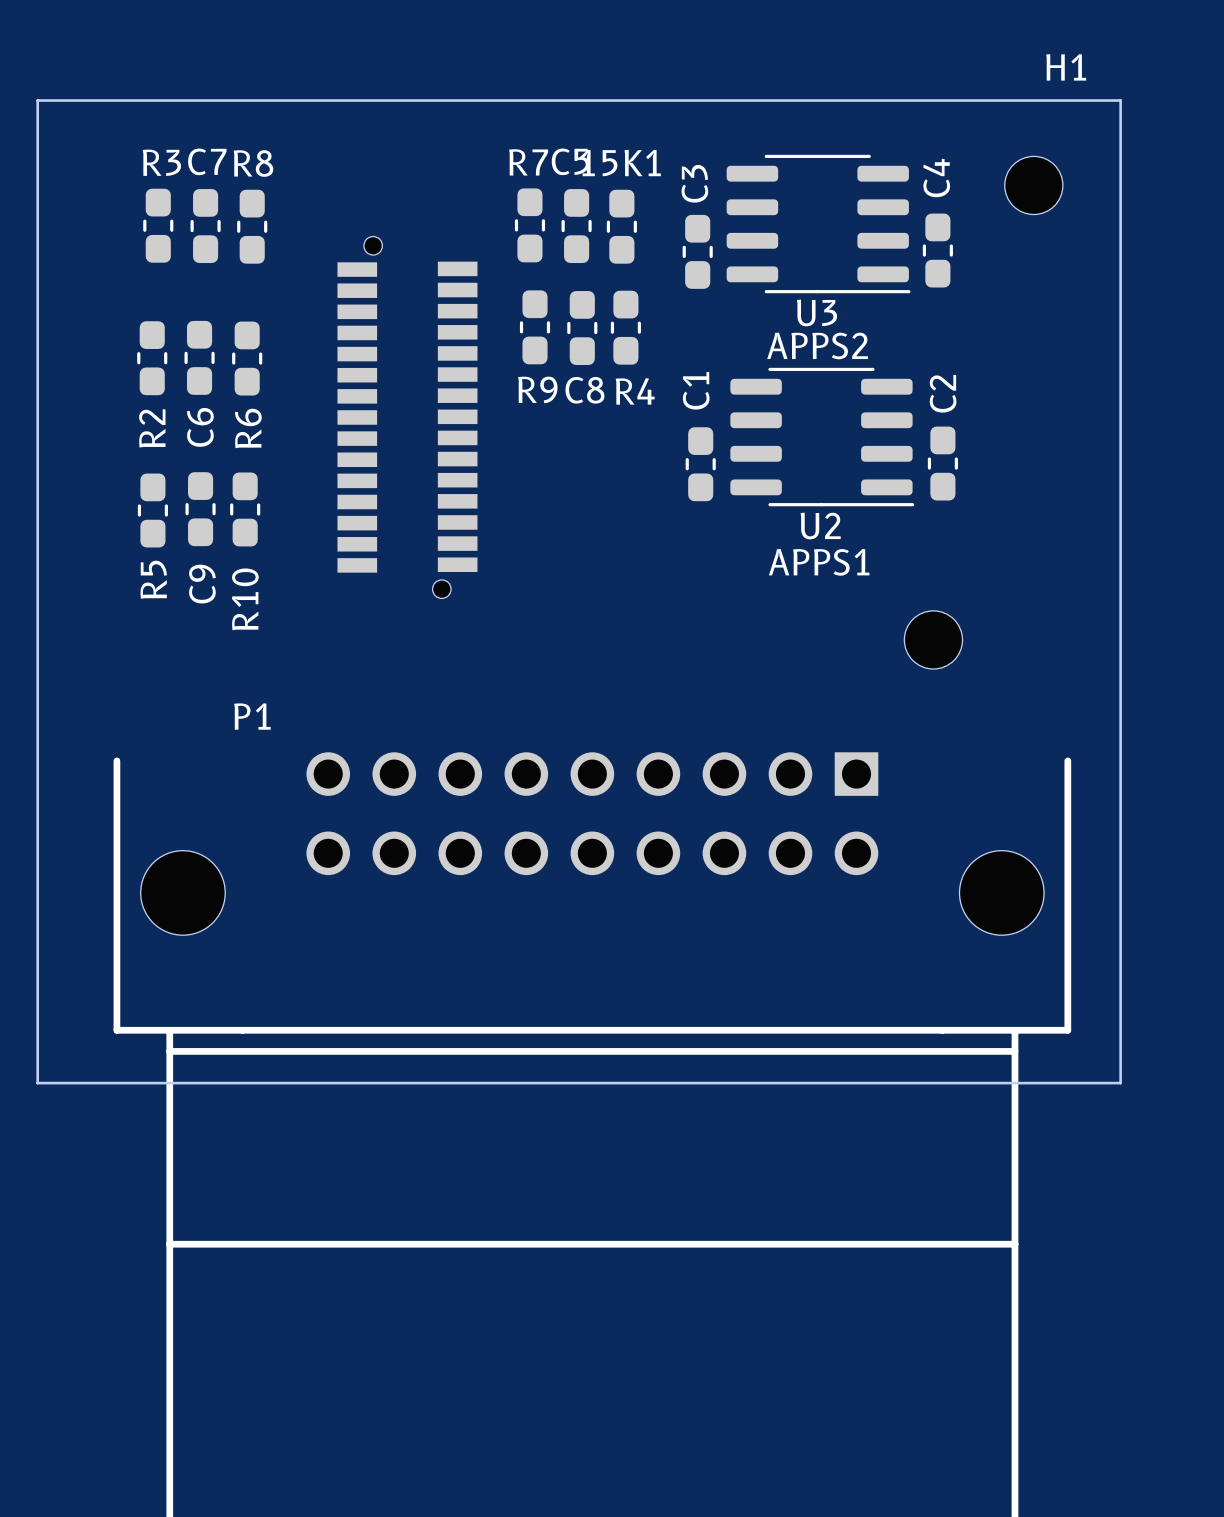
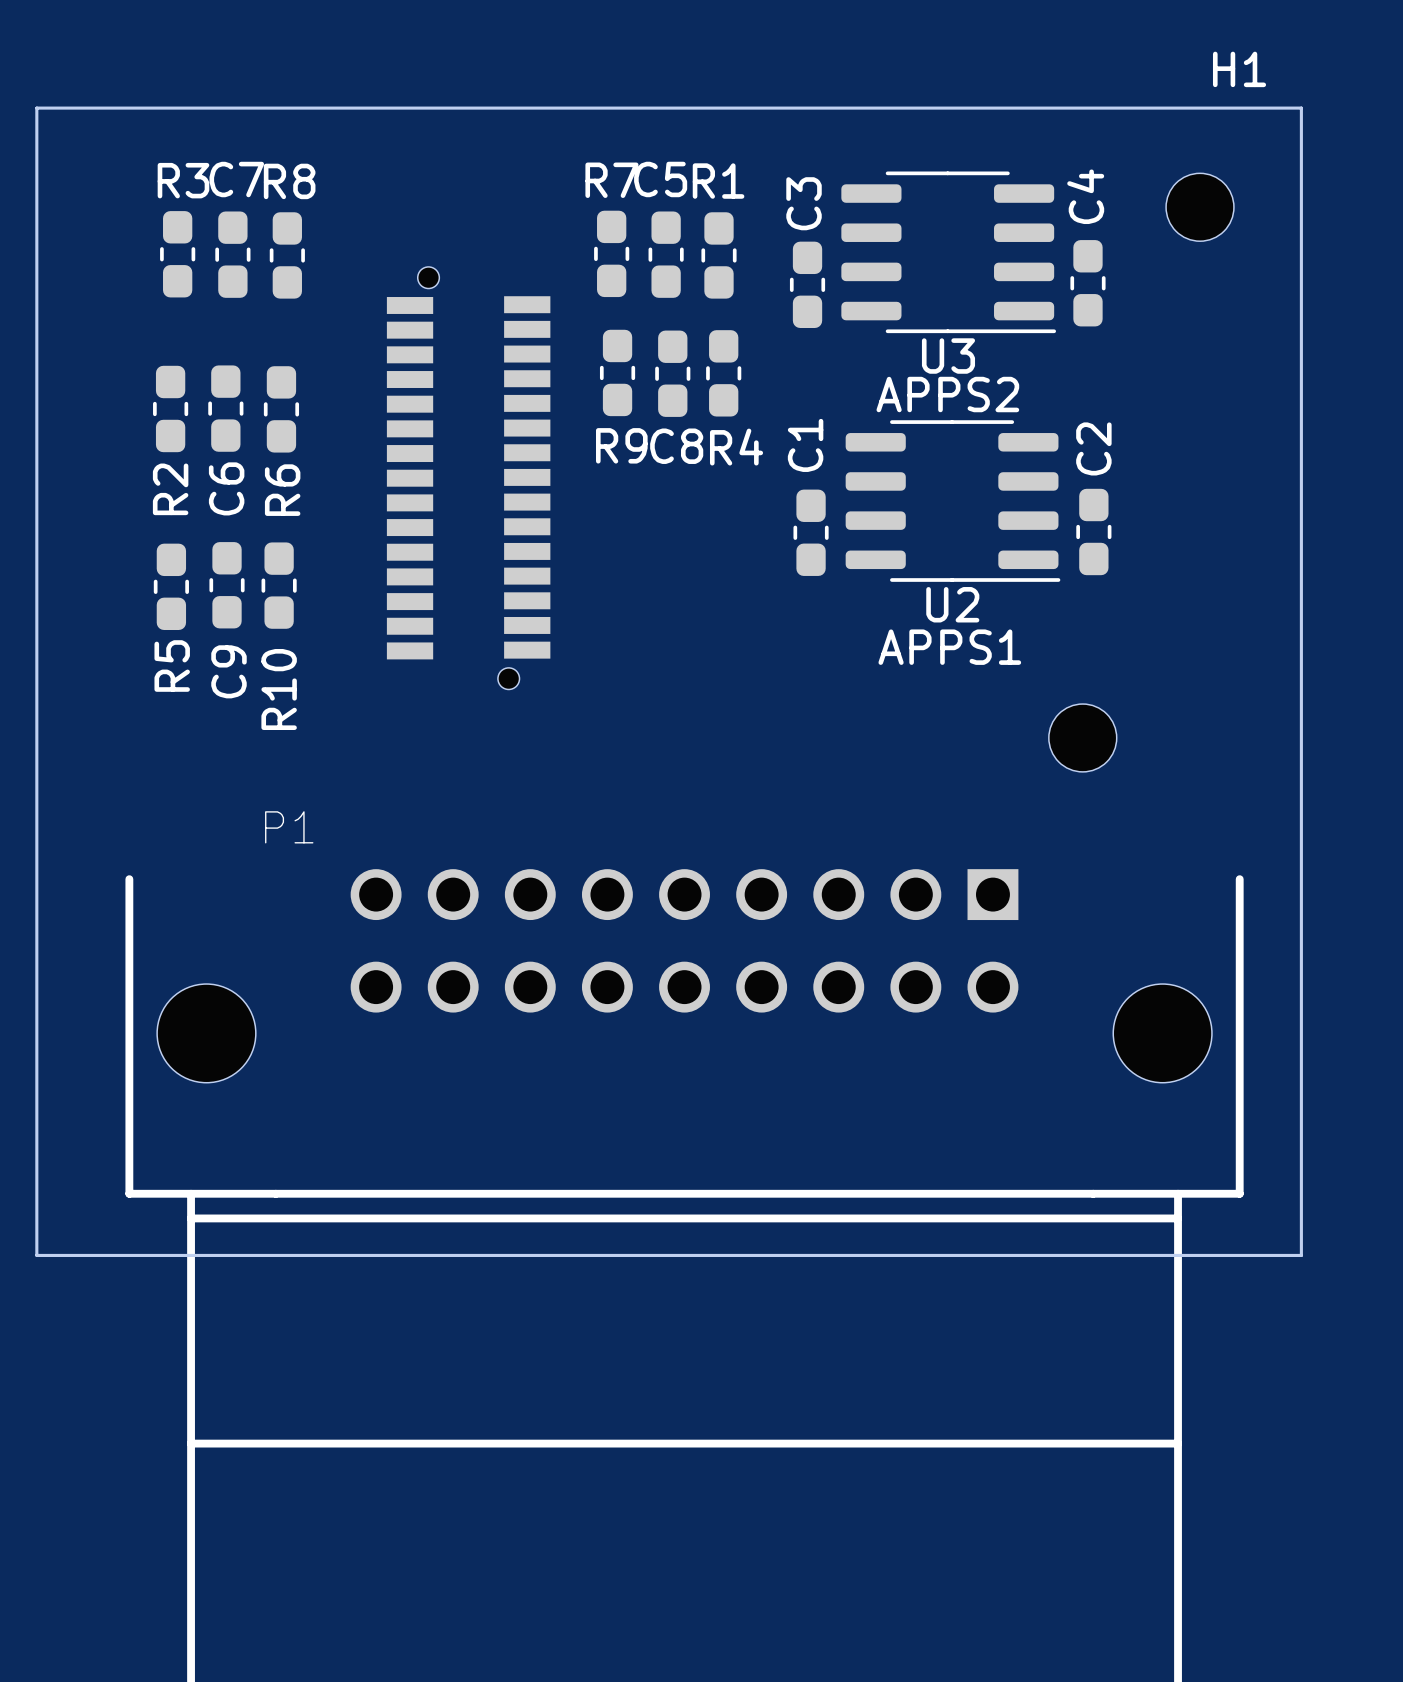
15K1 name: 15K1 (620, 163) -> R1 (718, 181)

